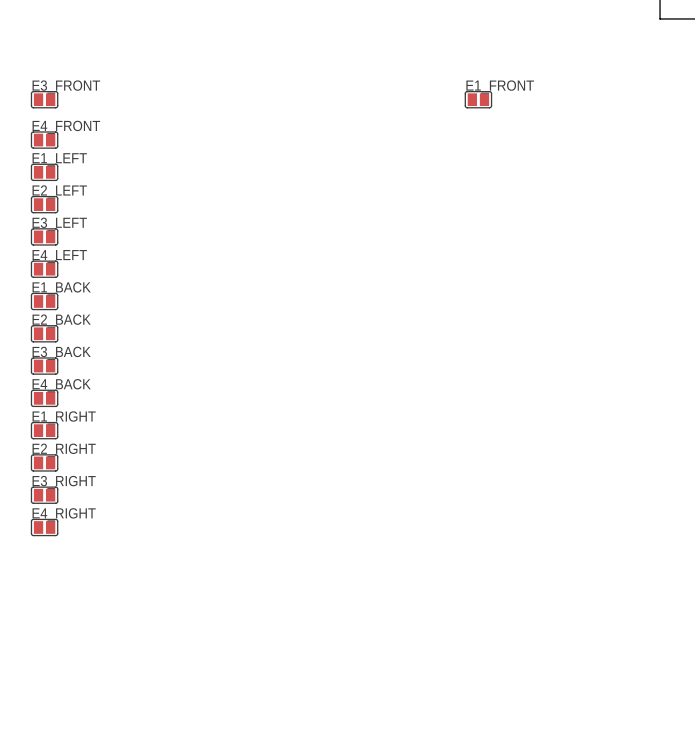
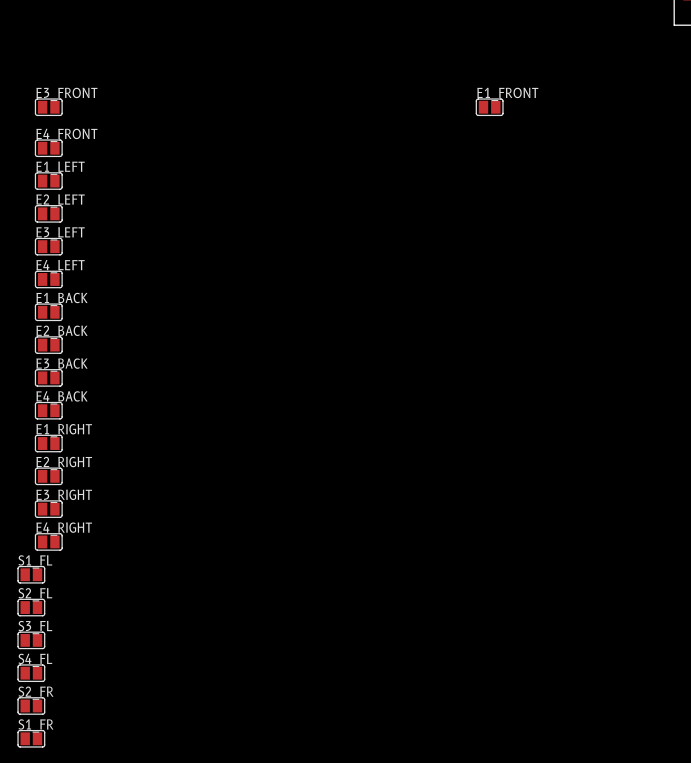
S1_FL: none -> (31, 574)
S2_FL: none -> (31, 607)
S3_FL: none -> (31, 640)
S4_FL: none -> (31, 673)
S2_FR: none -> (31, 705)
S1_FR: none -> (31, 738)

